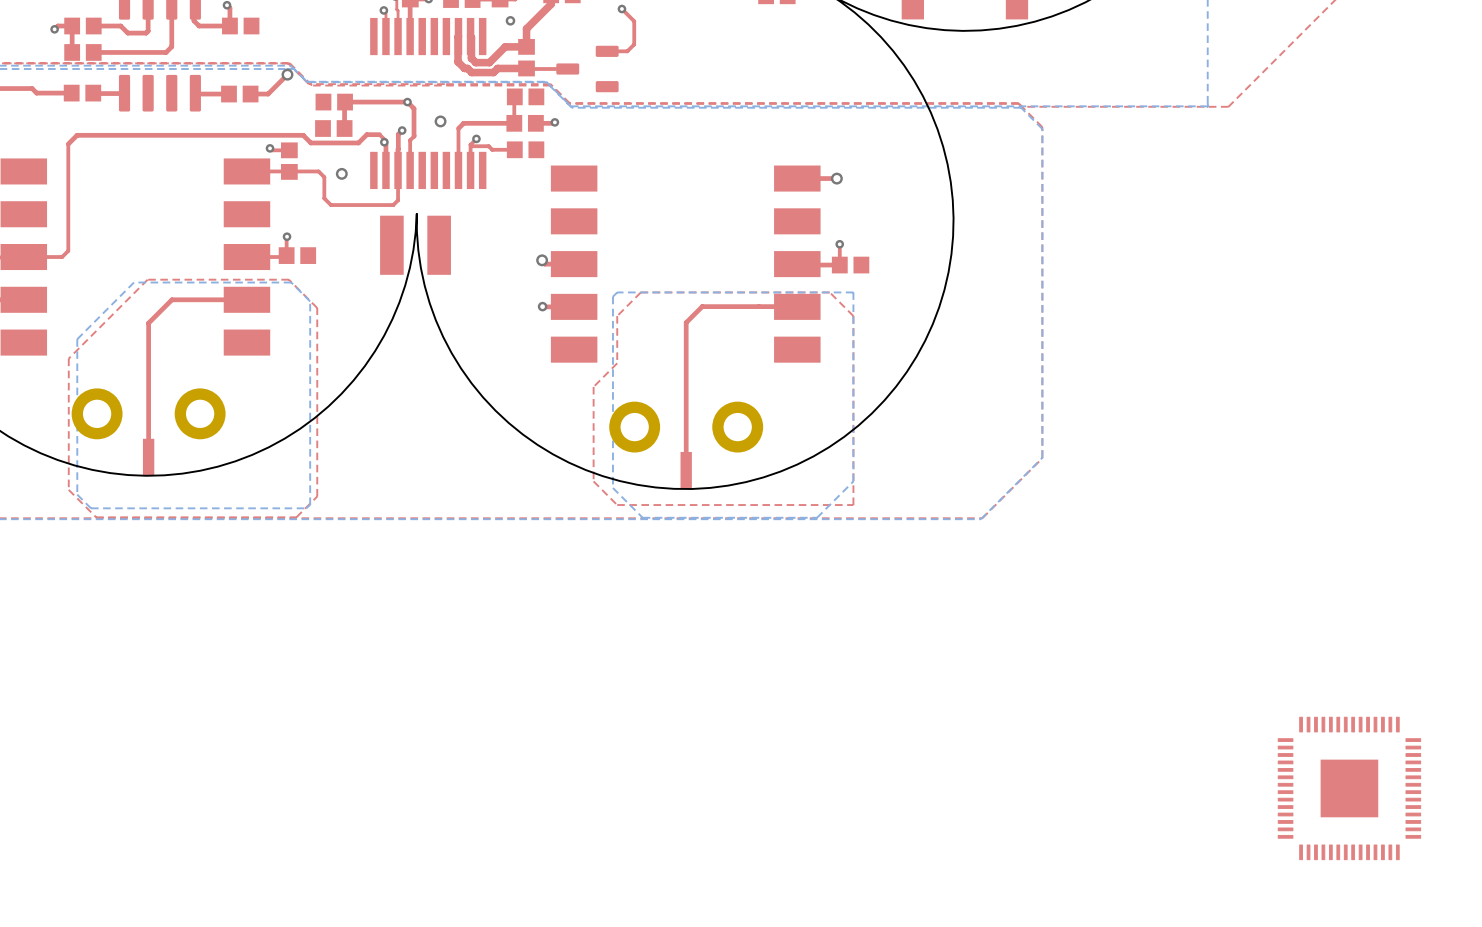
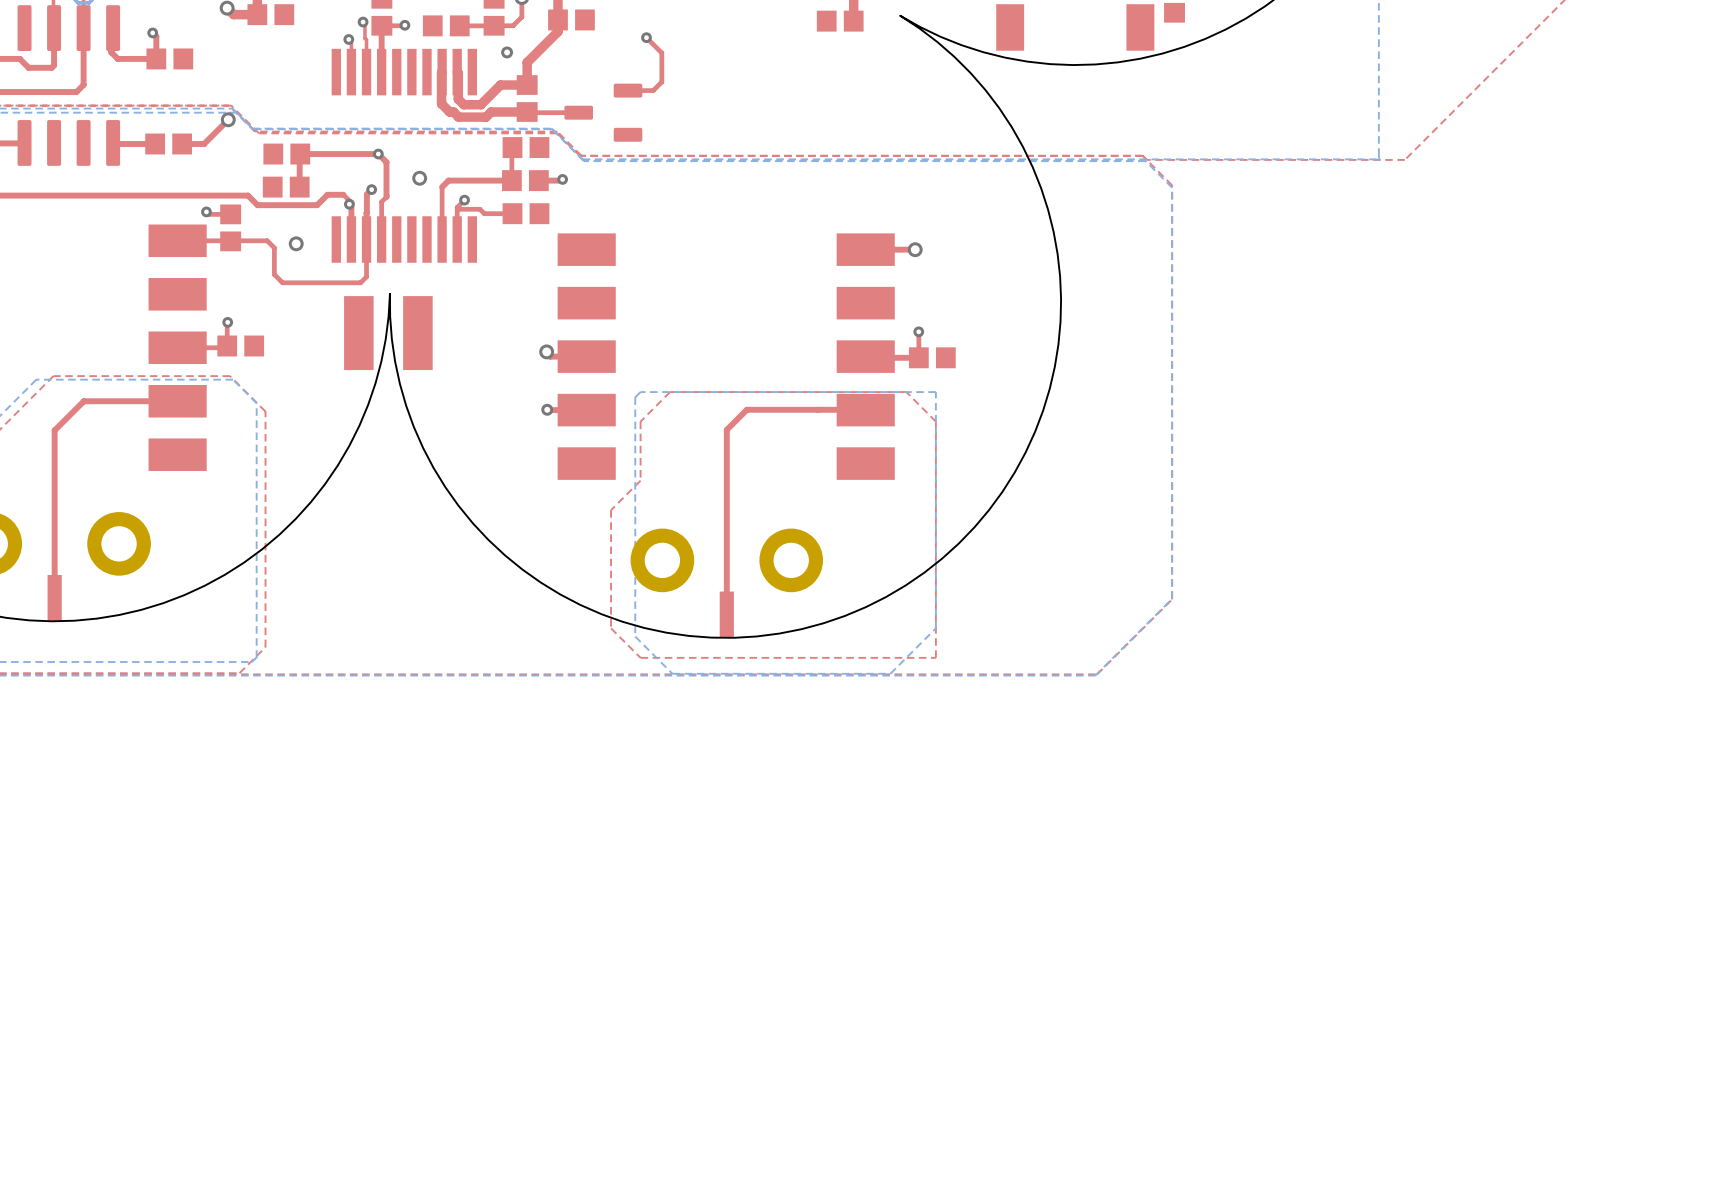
part: (1349, 788) -> none

